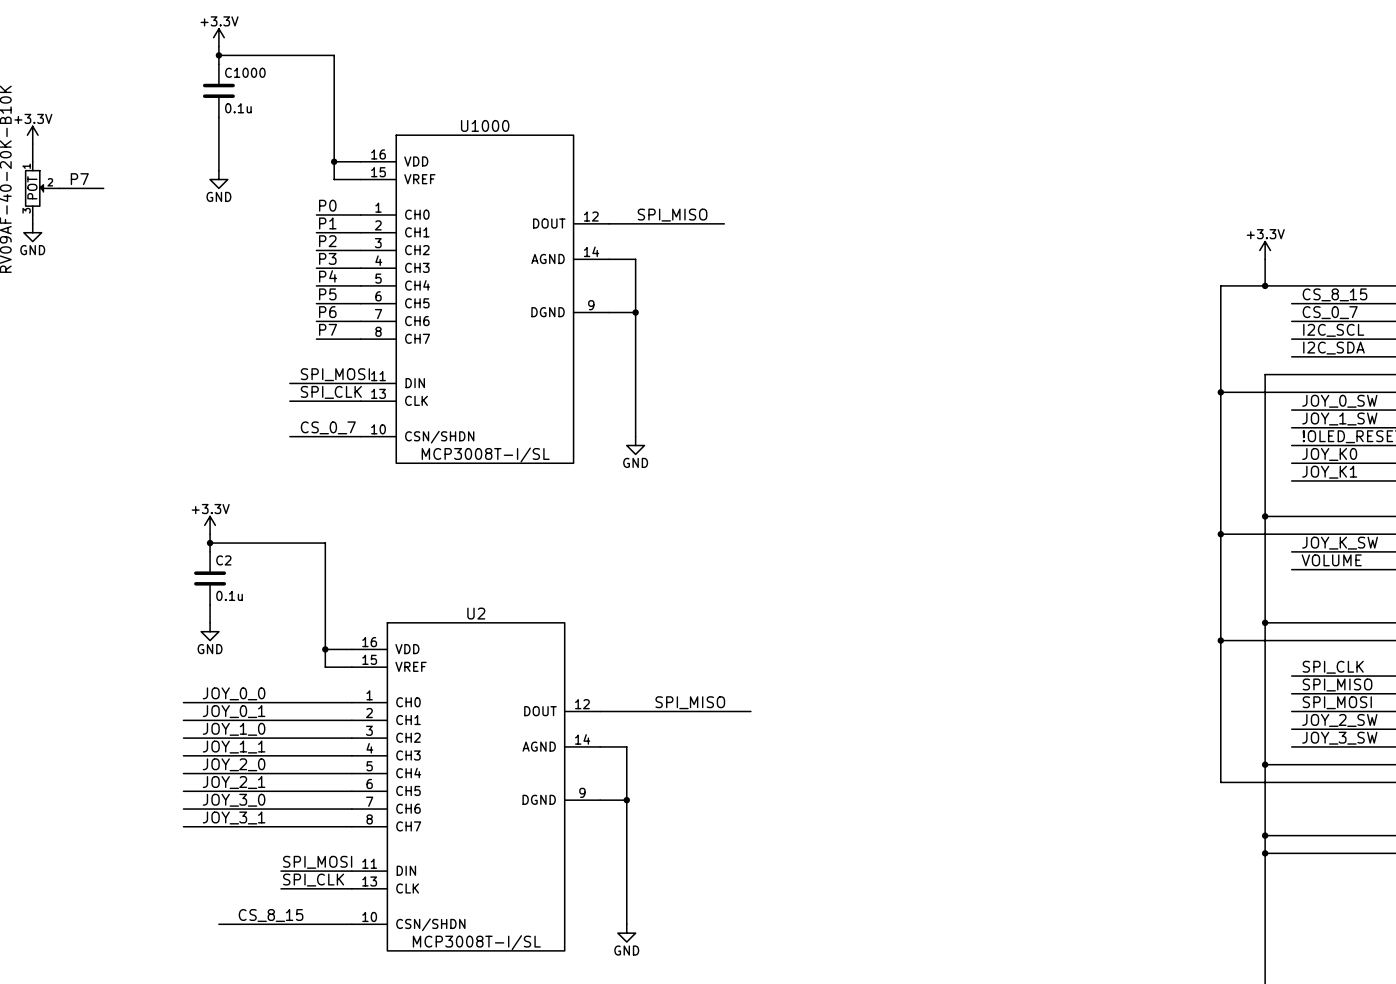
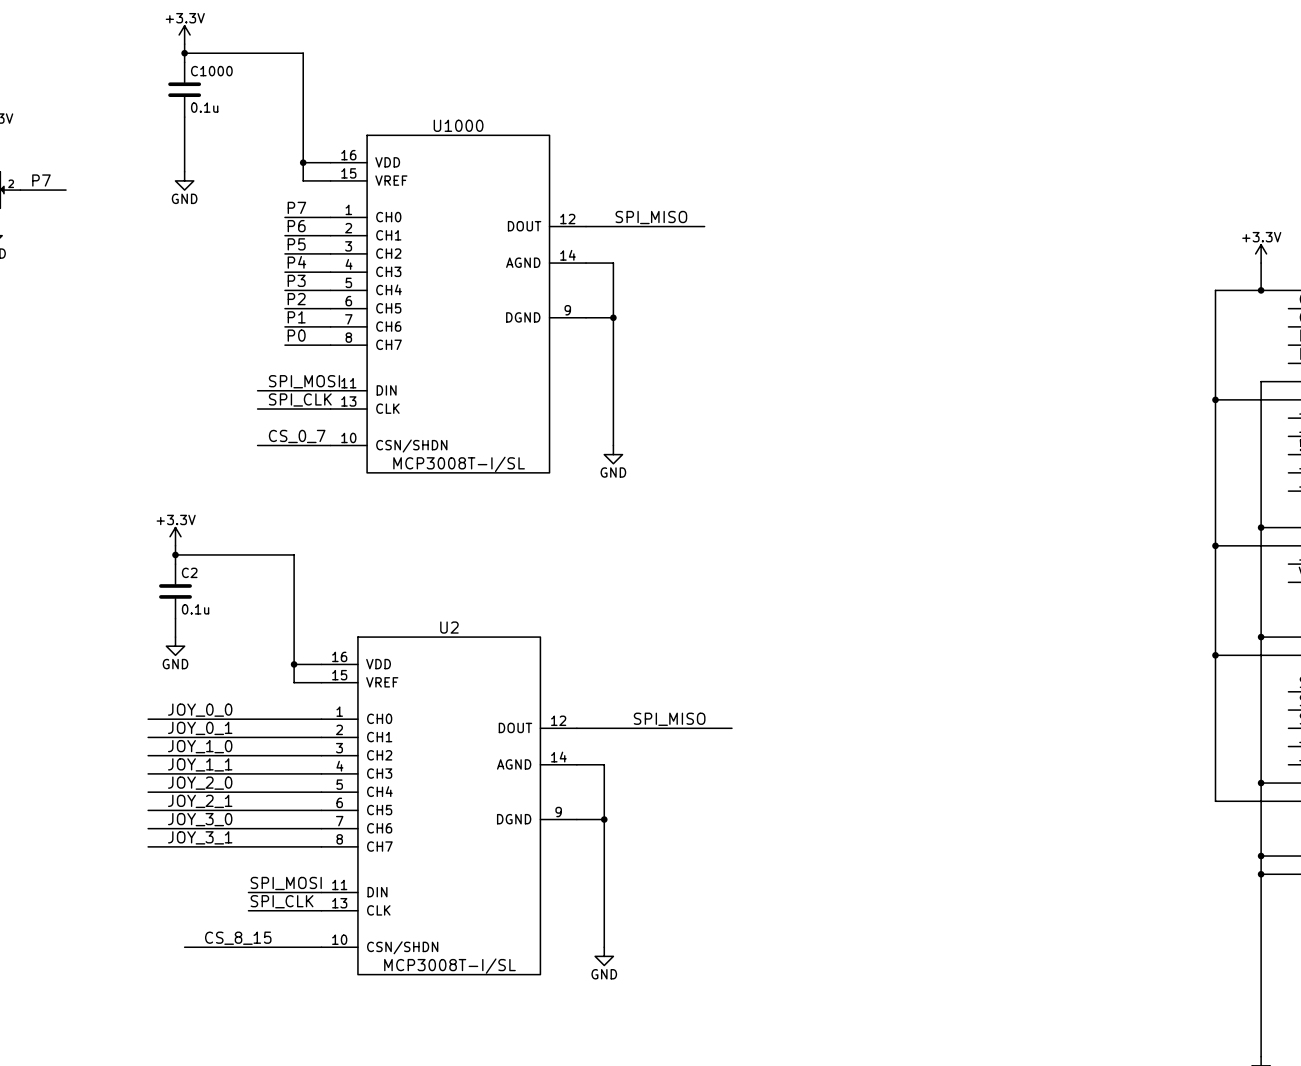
label: P0 (327, 205) -> P7 (296, 207)
label: P1 (327, 223) -> P6 (296, 226)
label: P2 (327, 241) -> P5 (296, 244)
label: P3 (327, 258) -> P4 (296, 262)
label: P4 (328, 276) -> P3 (296, 280)
label: P5 (327, 294) -> P2 (296, 299)
label: P6 (327, 312) -> P1 (296, 317)
label: P7 (328, 329) -> P0 (296, 335)

